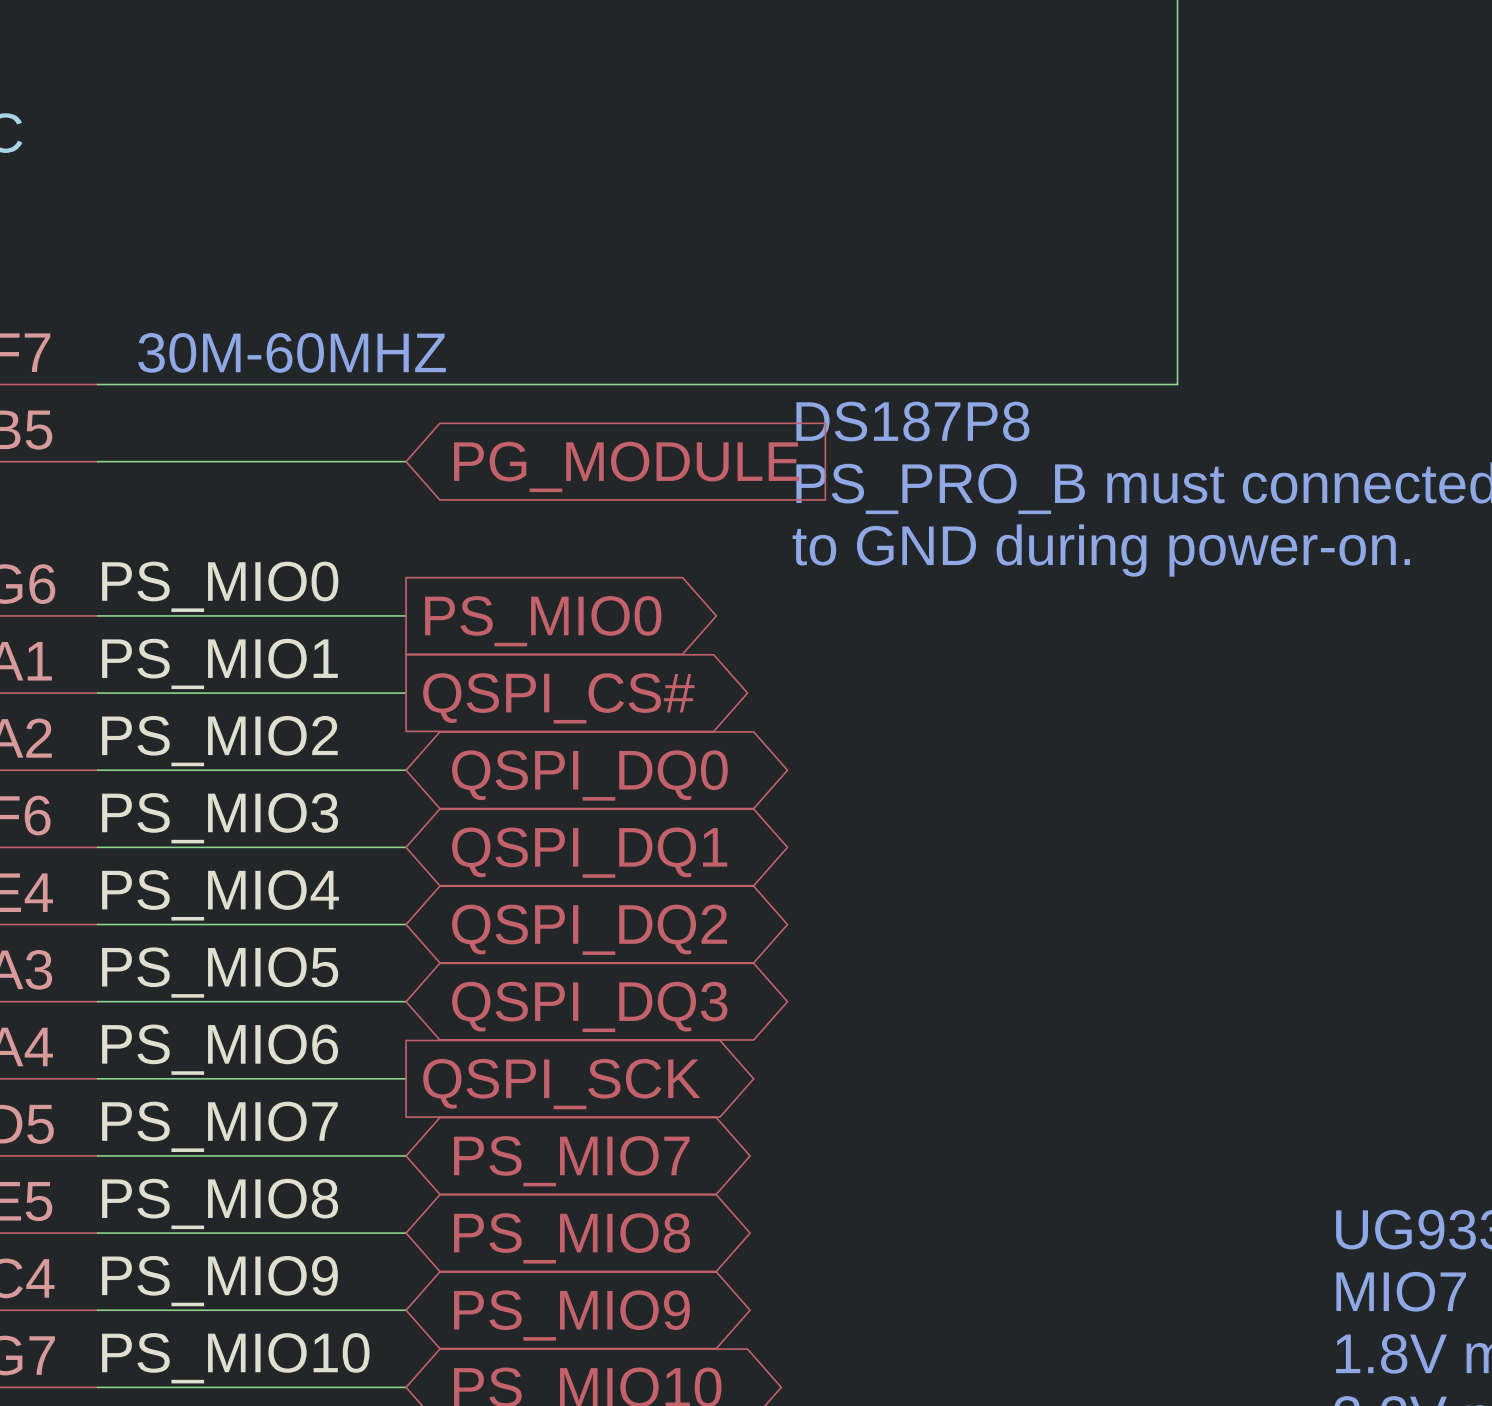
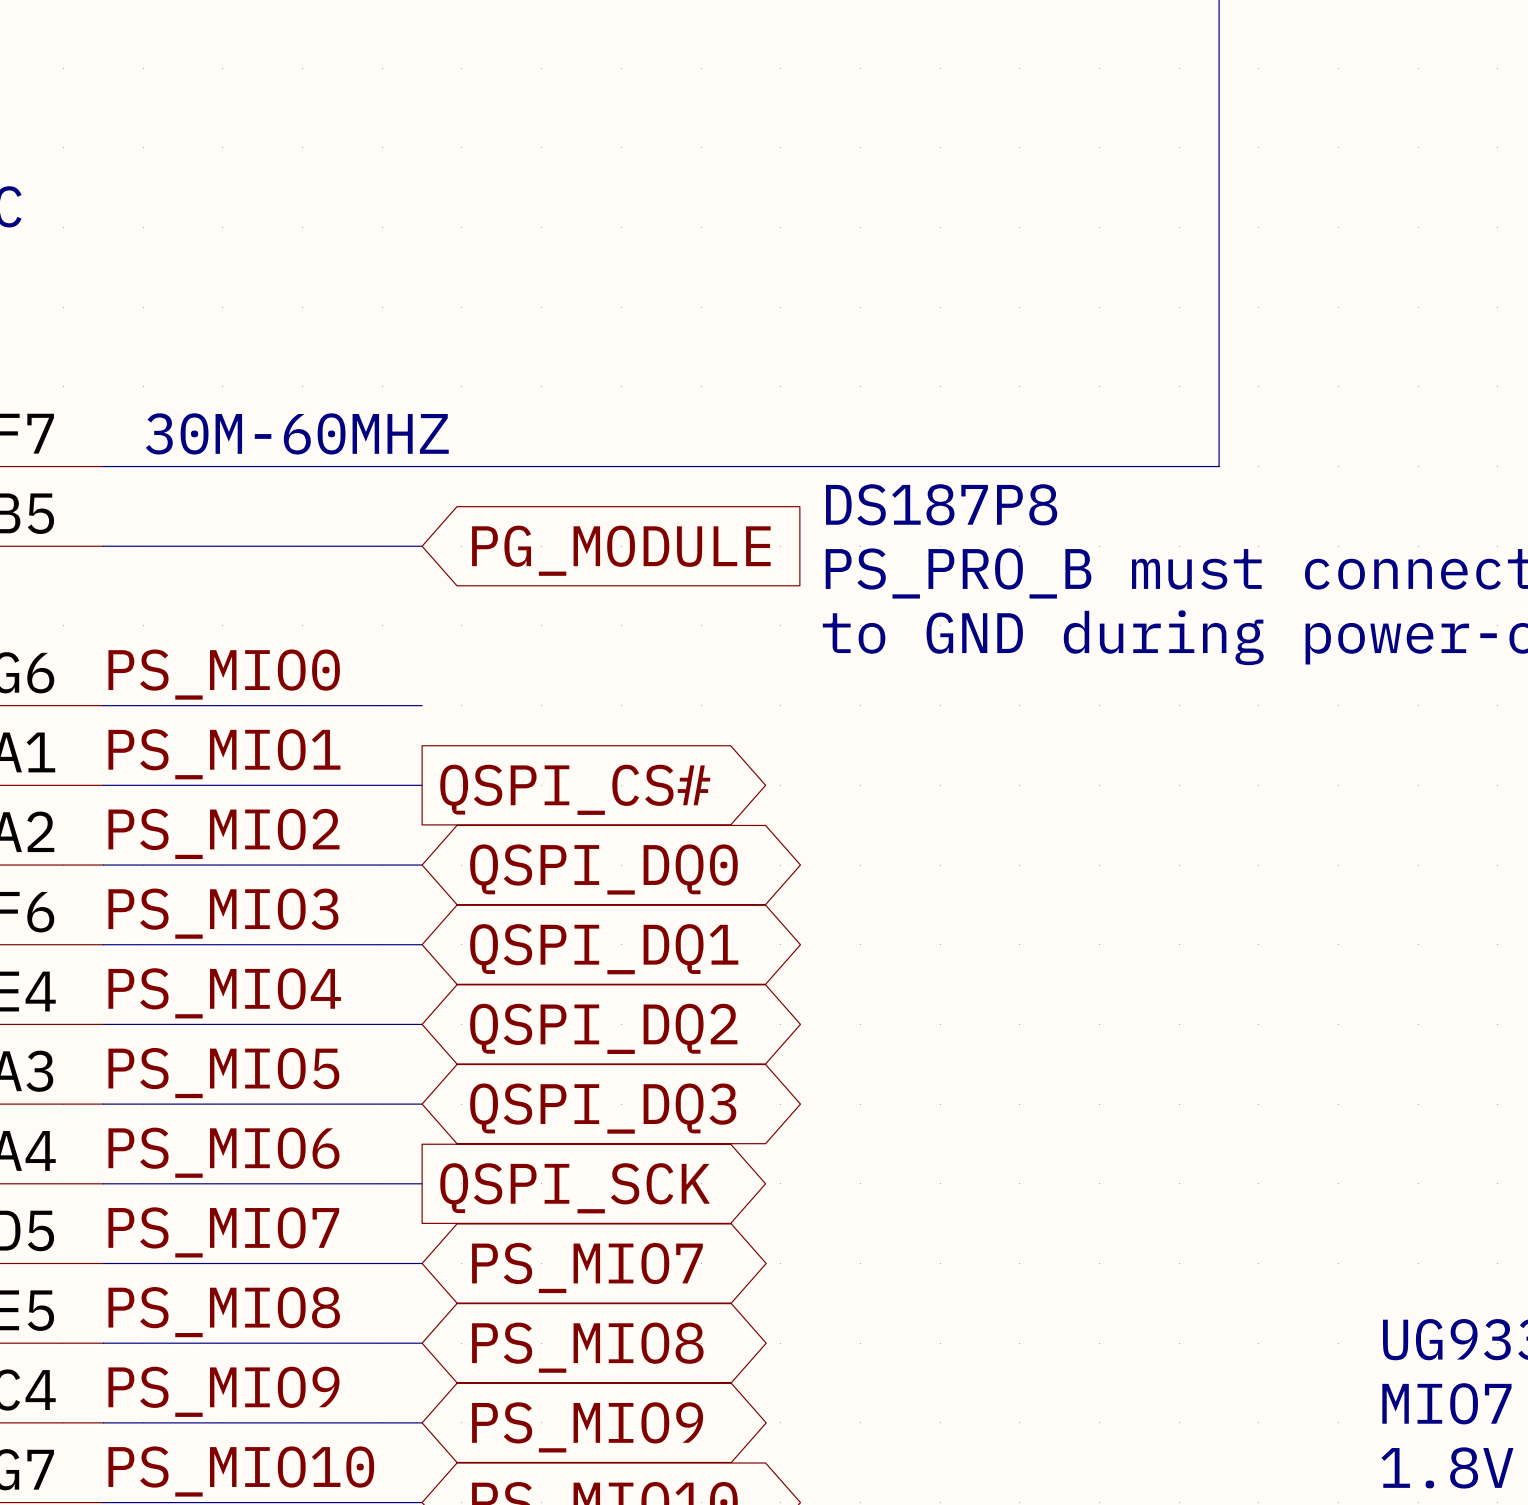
global label: PS_MIO0 (543, 621) -> none

